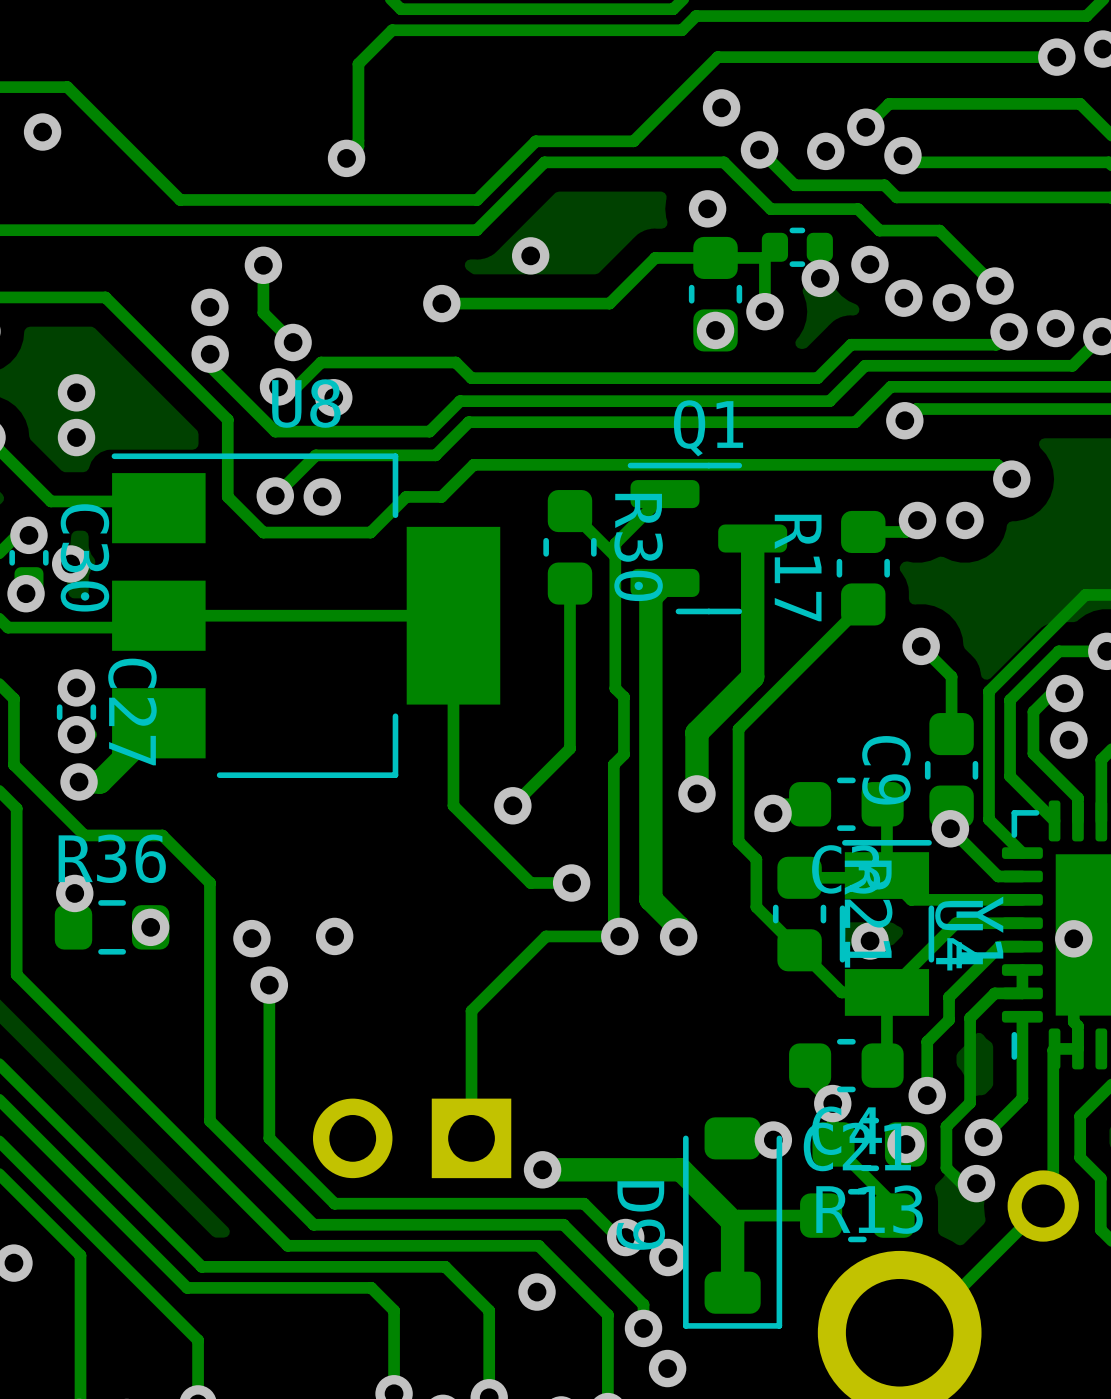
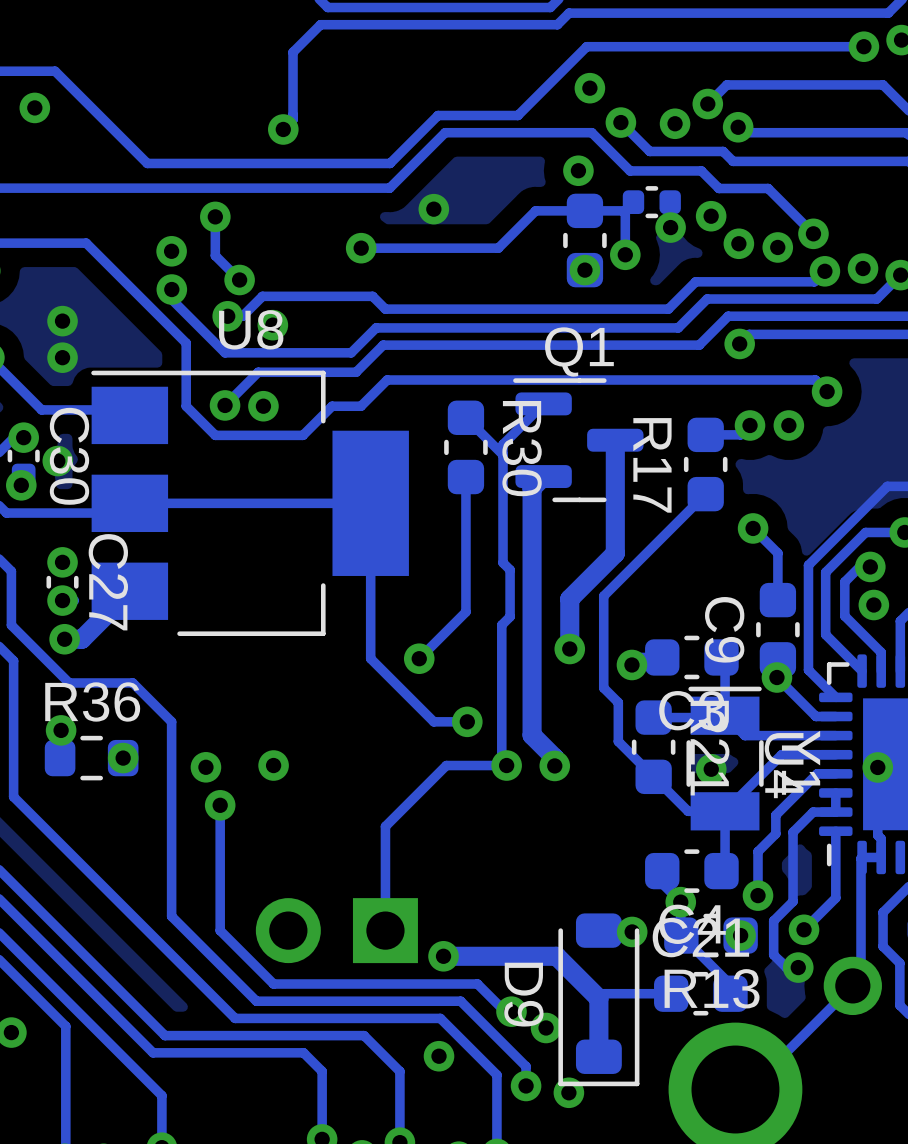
via position: (667, 1368) -> (568, 1092)

